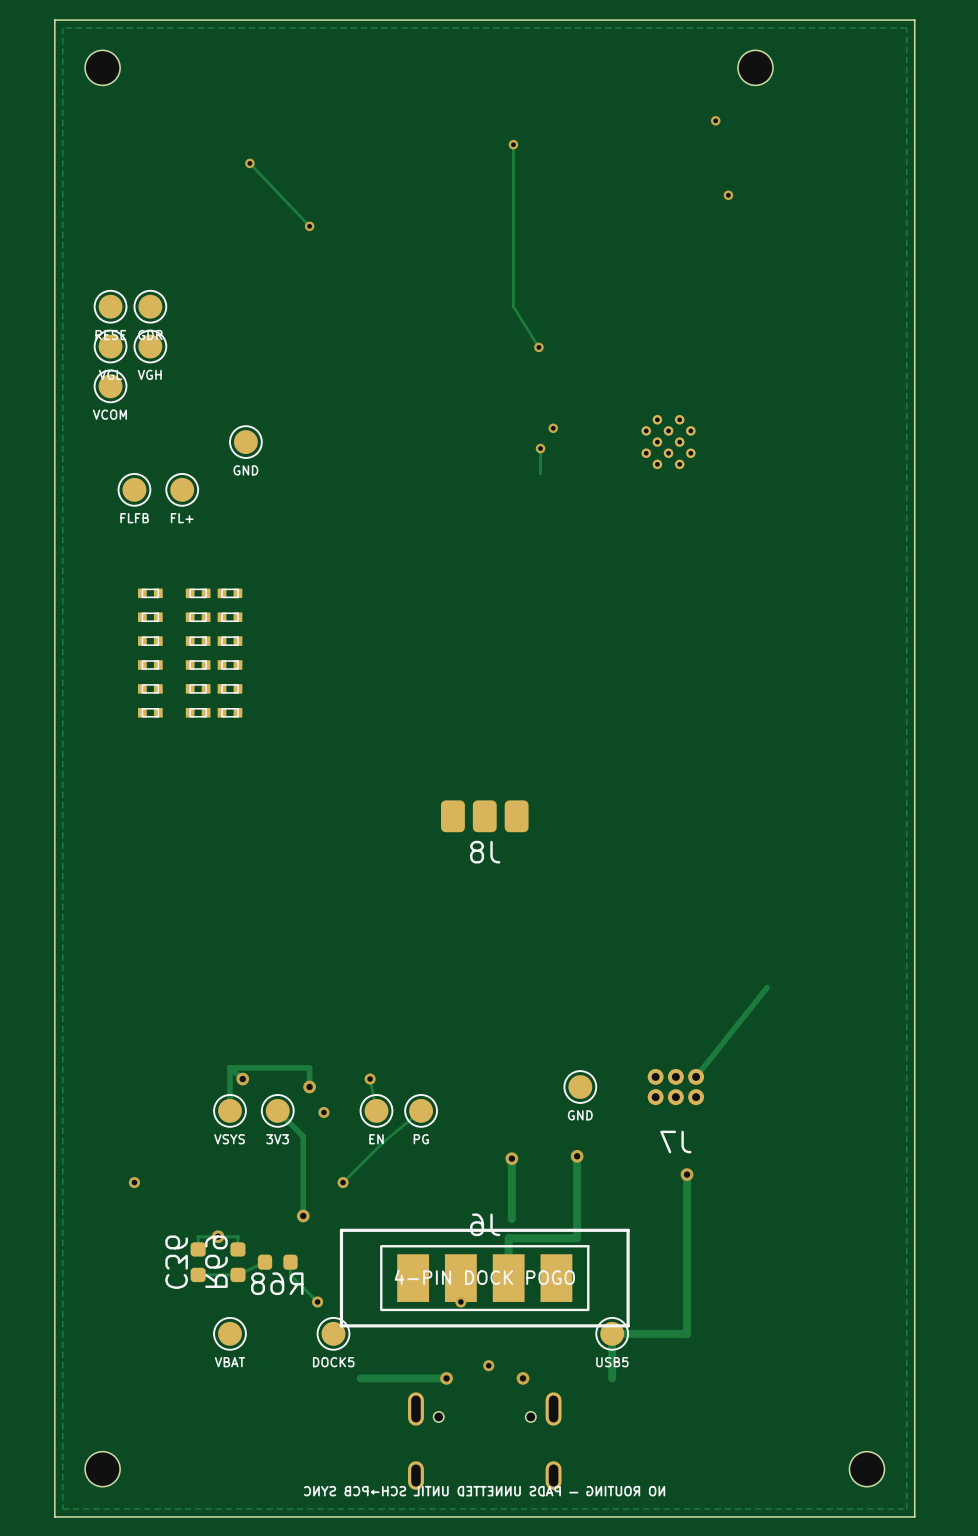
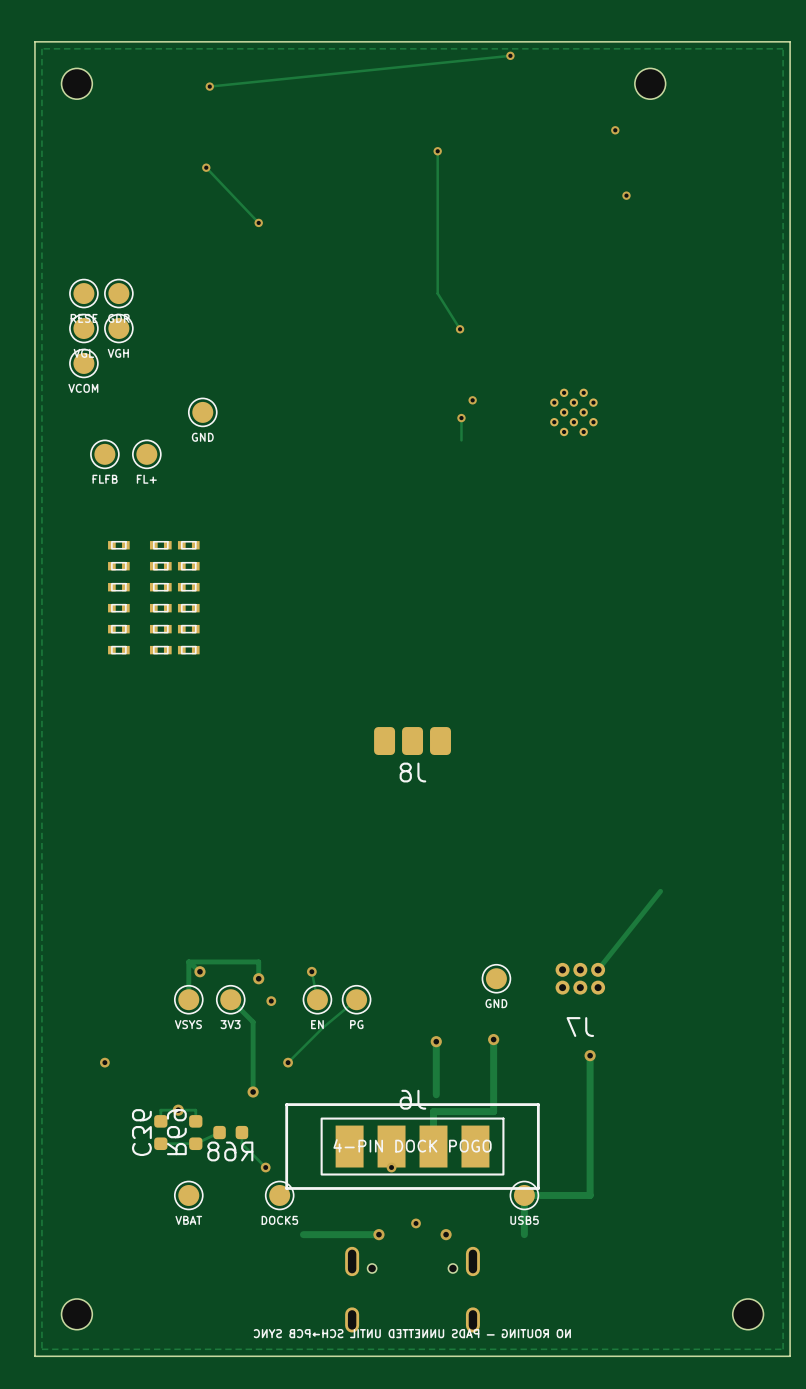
track: none -> (510, 55) (209, 86)
via: none -> (510, 55)
via: none -> (209, 86)

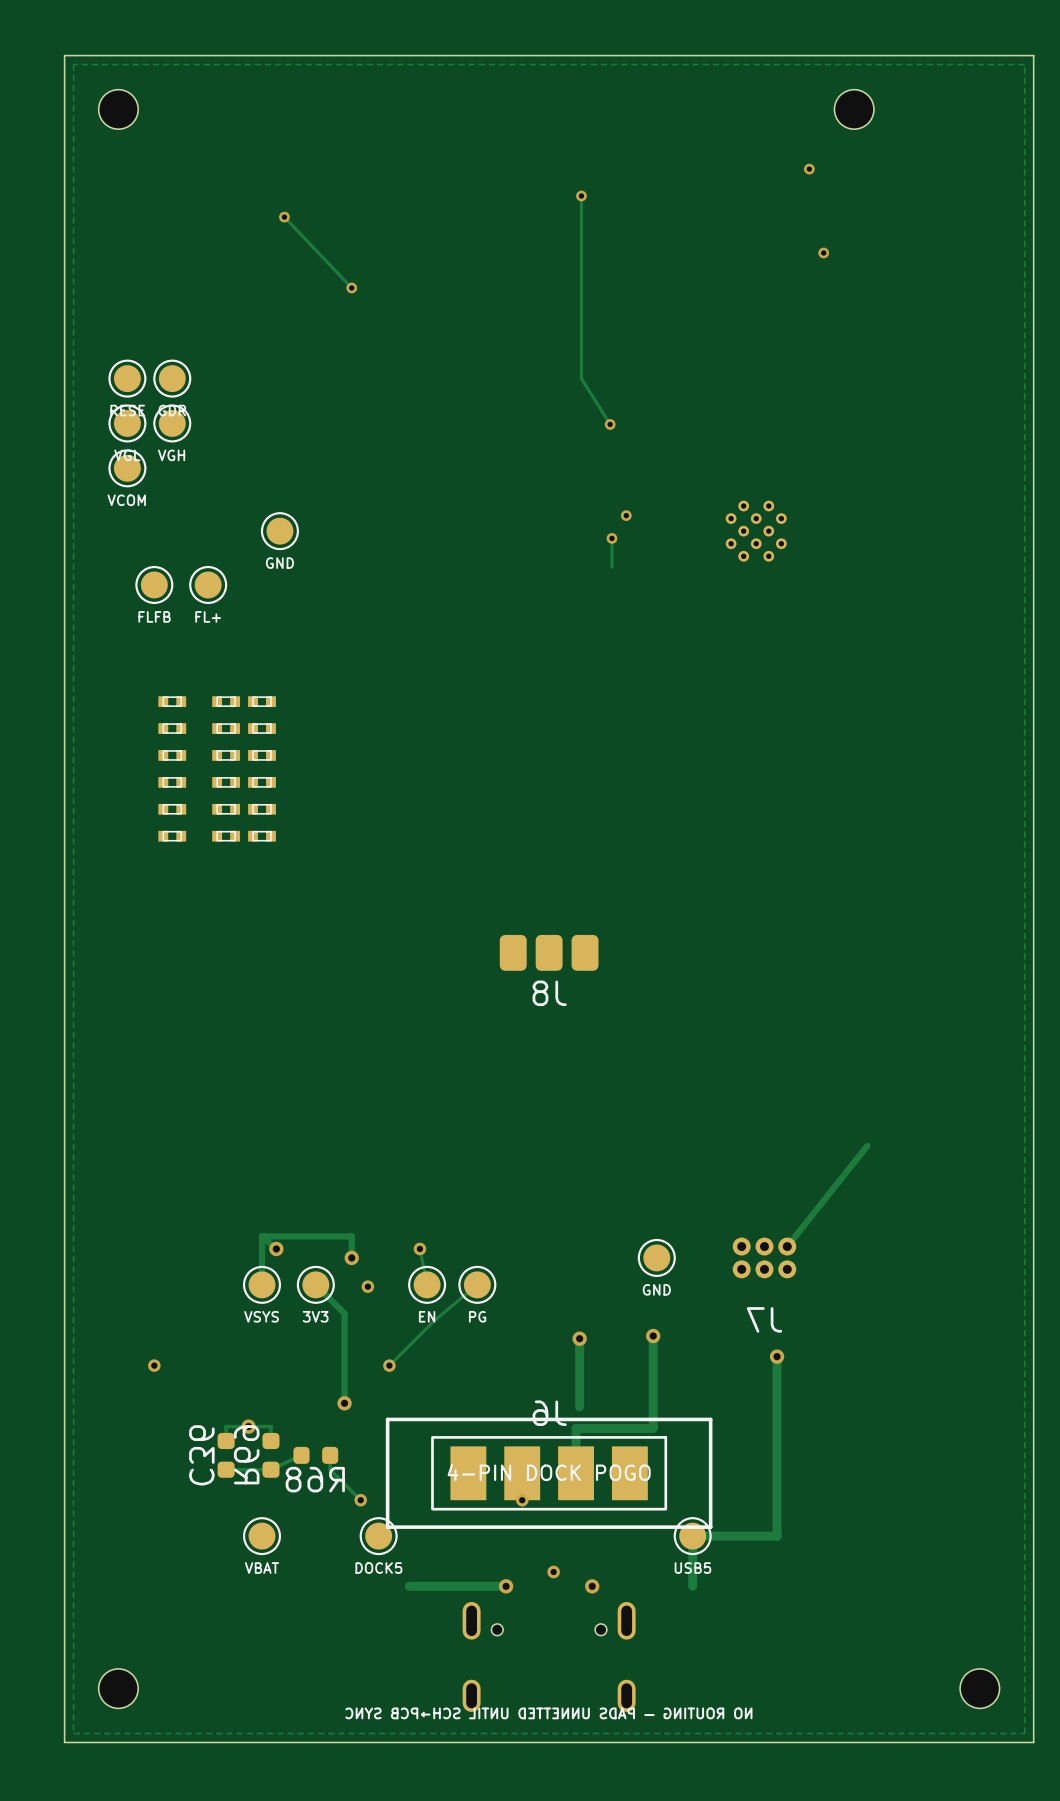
track: (510, 55) (209, 86) -> none
via: (510, 55) -> none
via: (209, 86) -> none

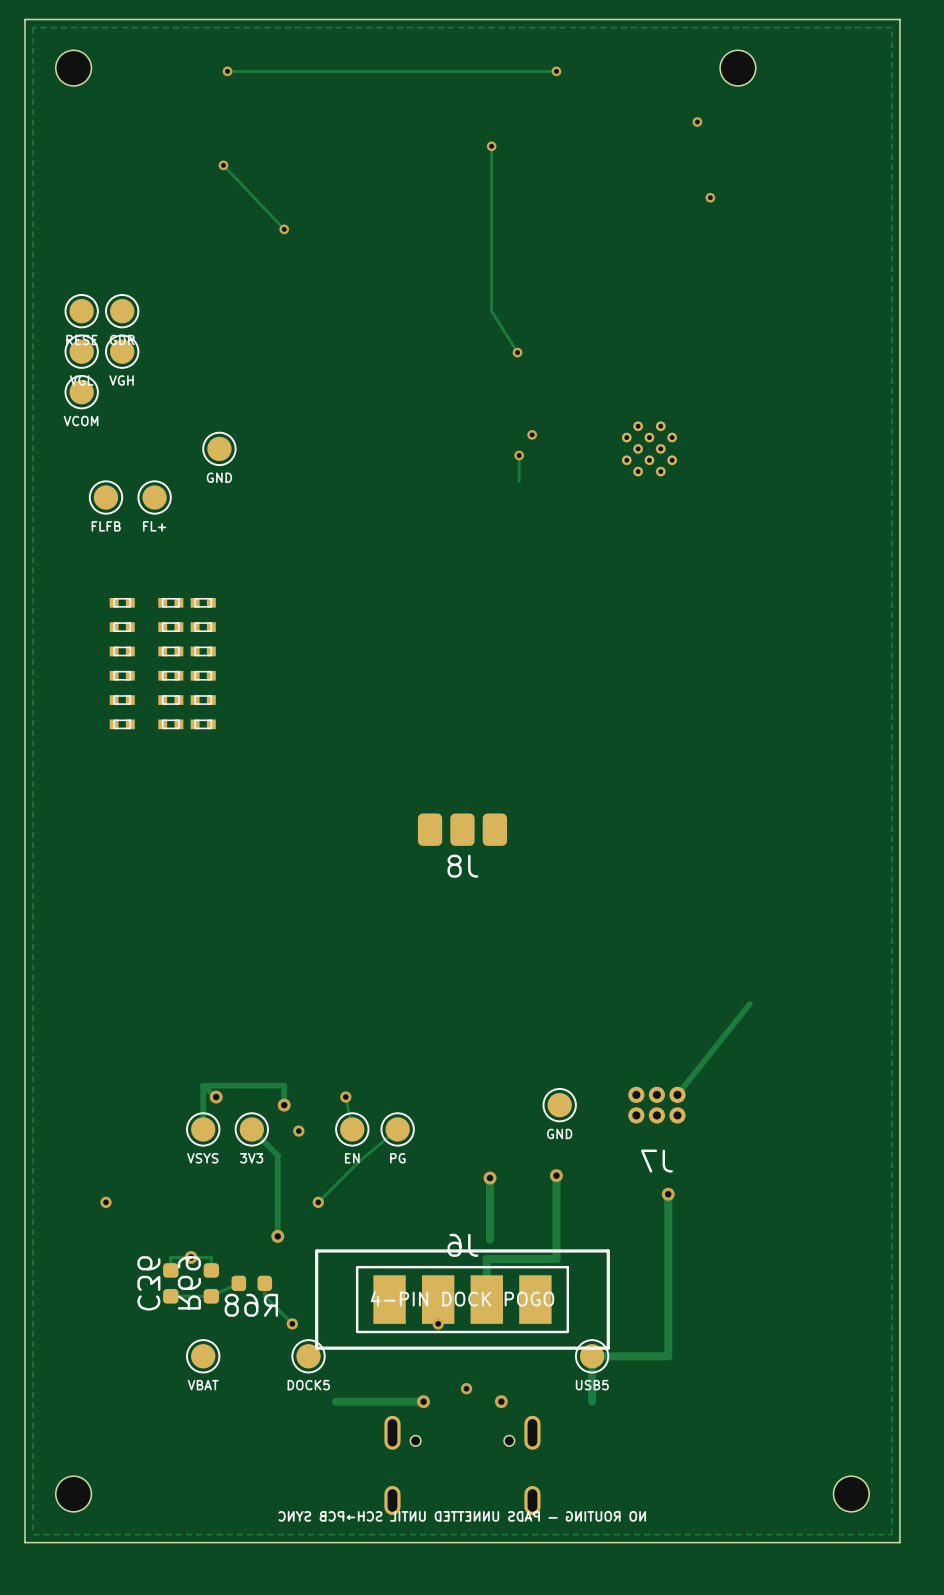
via: none -> (227, 71)
track: none -> (556, 71) (227, 71)
via: none -> (556, 71)

